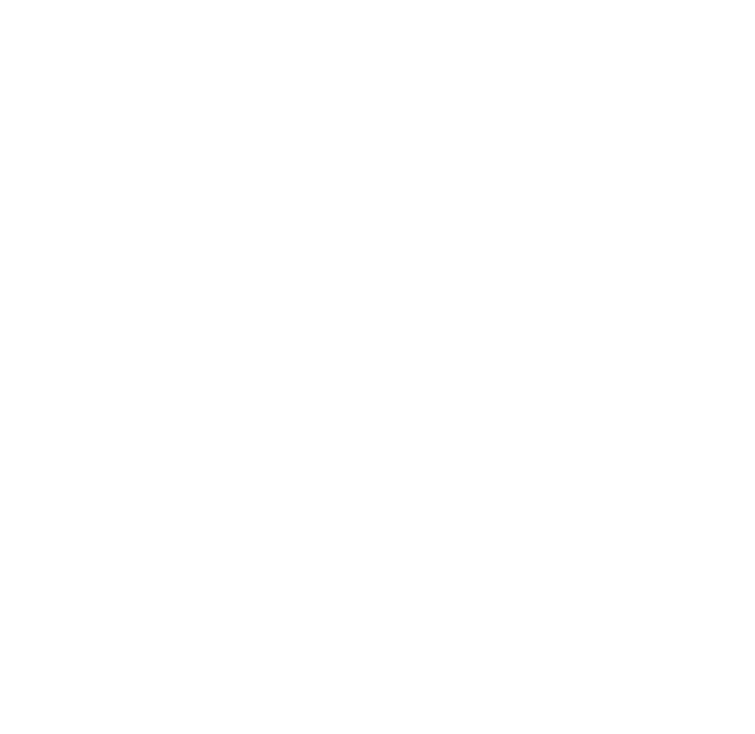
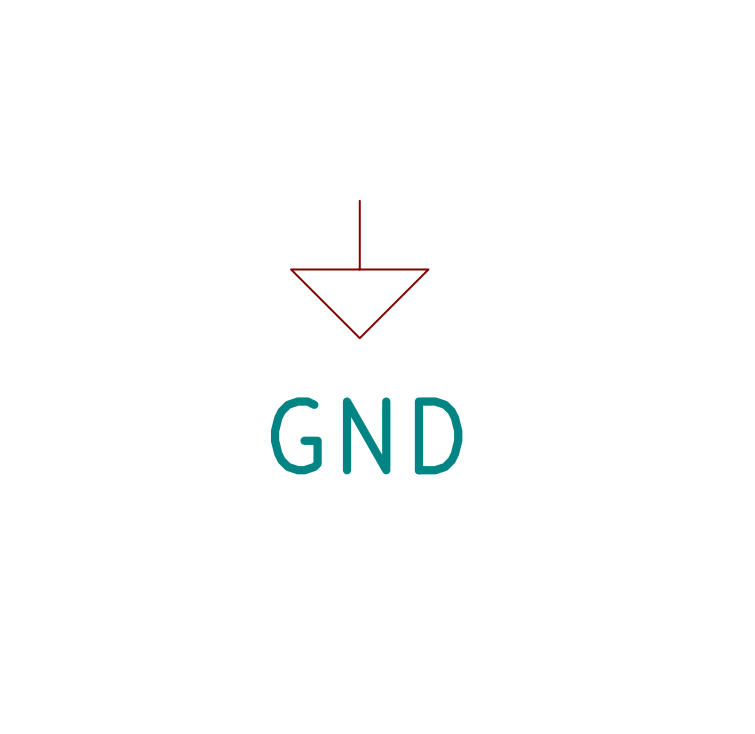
power symbol: none -> GND (359, 269)

